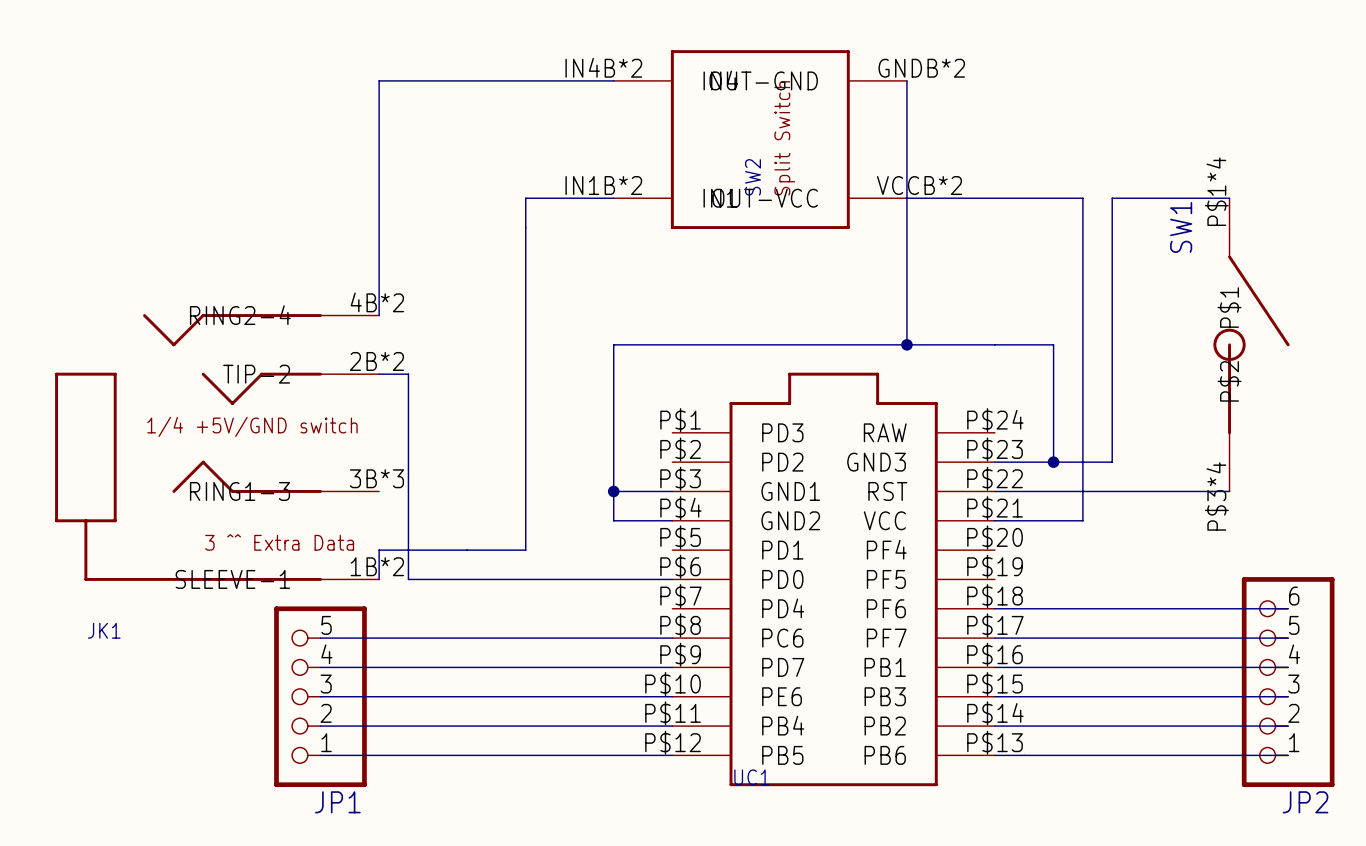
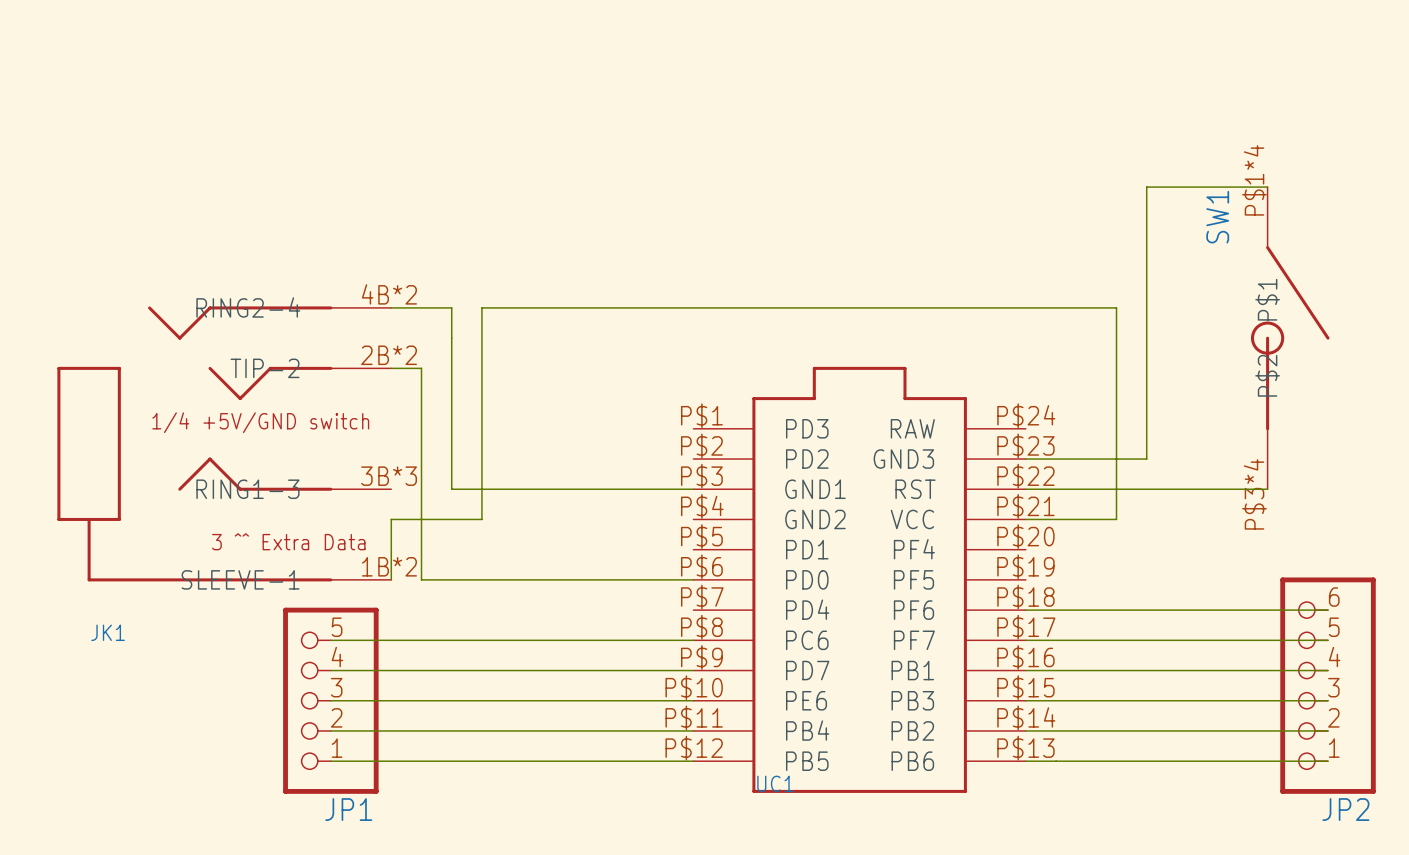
wire: (613, 80) (379, 80) (379, 315) -> (633, 489) (451, 489) (451, 307) (391, 307)
wire: (906, 80) (906, 344) -> none
SW2: (760, 139) -> none
wire: (613, 198) (525, 198) (525, 550) (379, 550) -> (1116, 307) (481, 307) (481, 519) (391, 519) (391, 549)
wire: (906, 198) (1082, 198) (1082, 315) -> none
junction: (906, 344) -> none
wire: (1053, 462) (1053, 344) (613, 344) (613, 520) (672, 520) -> none
junction: (1053, 462) -> none
junction: (613, 491) -> none

